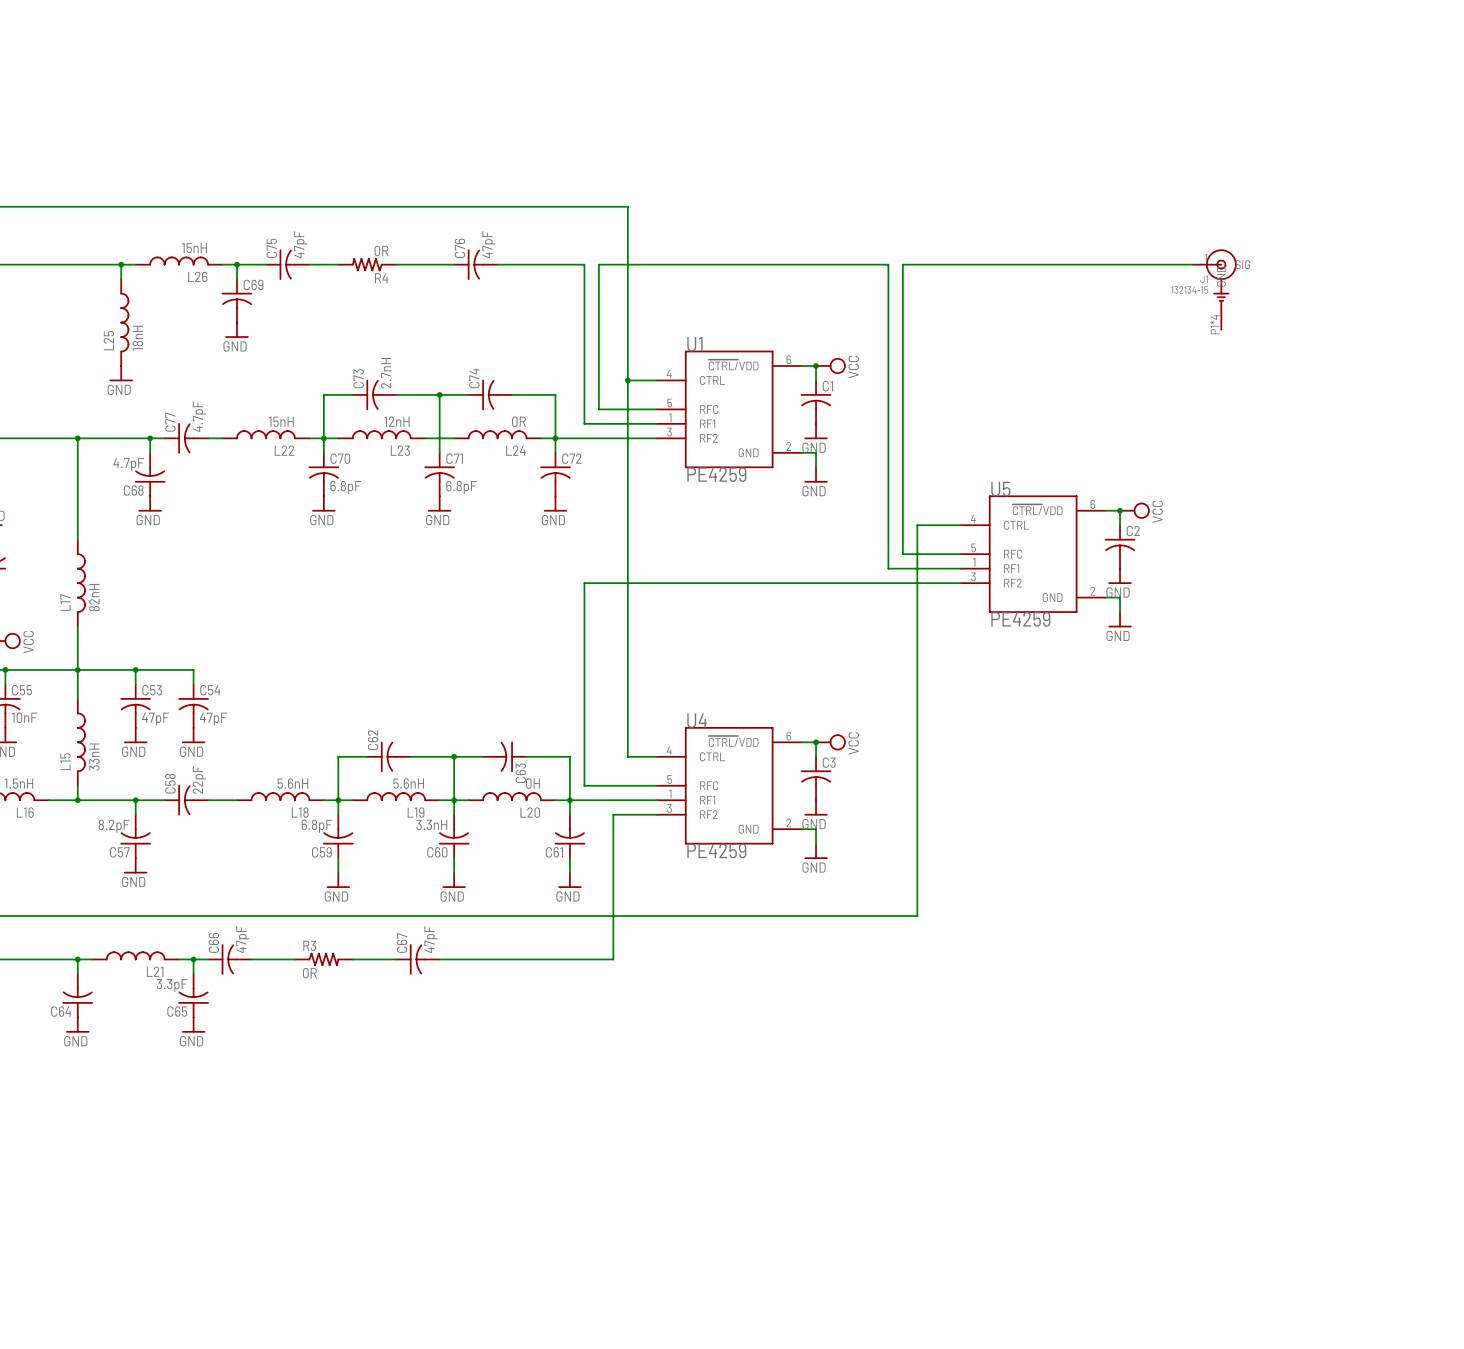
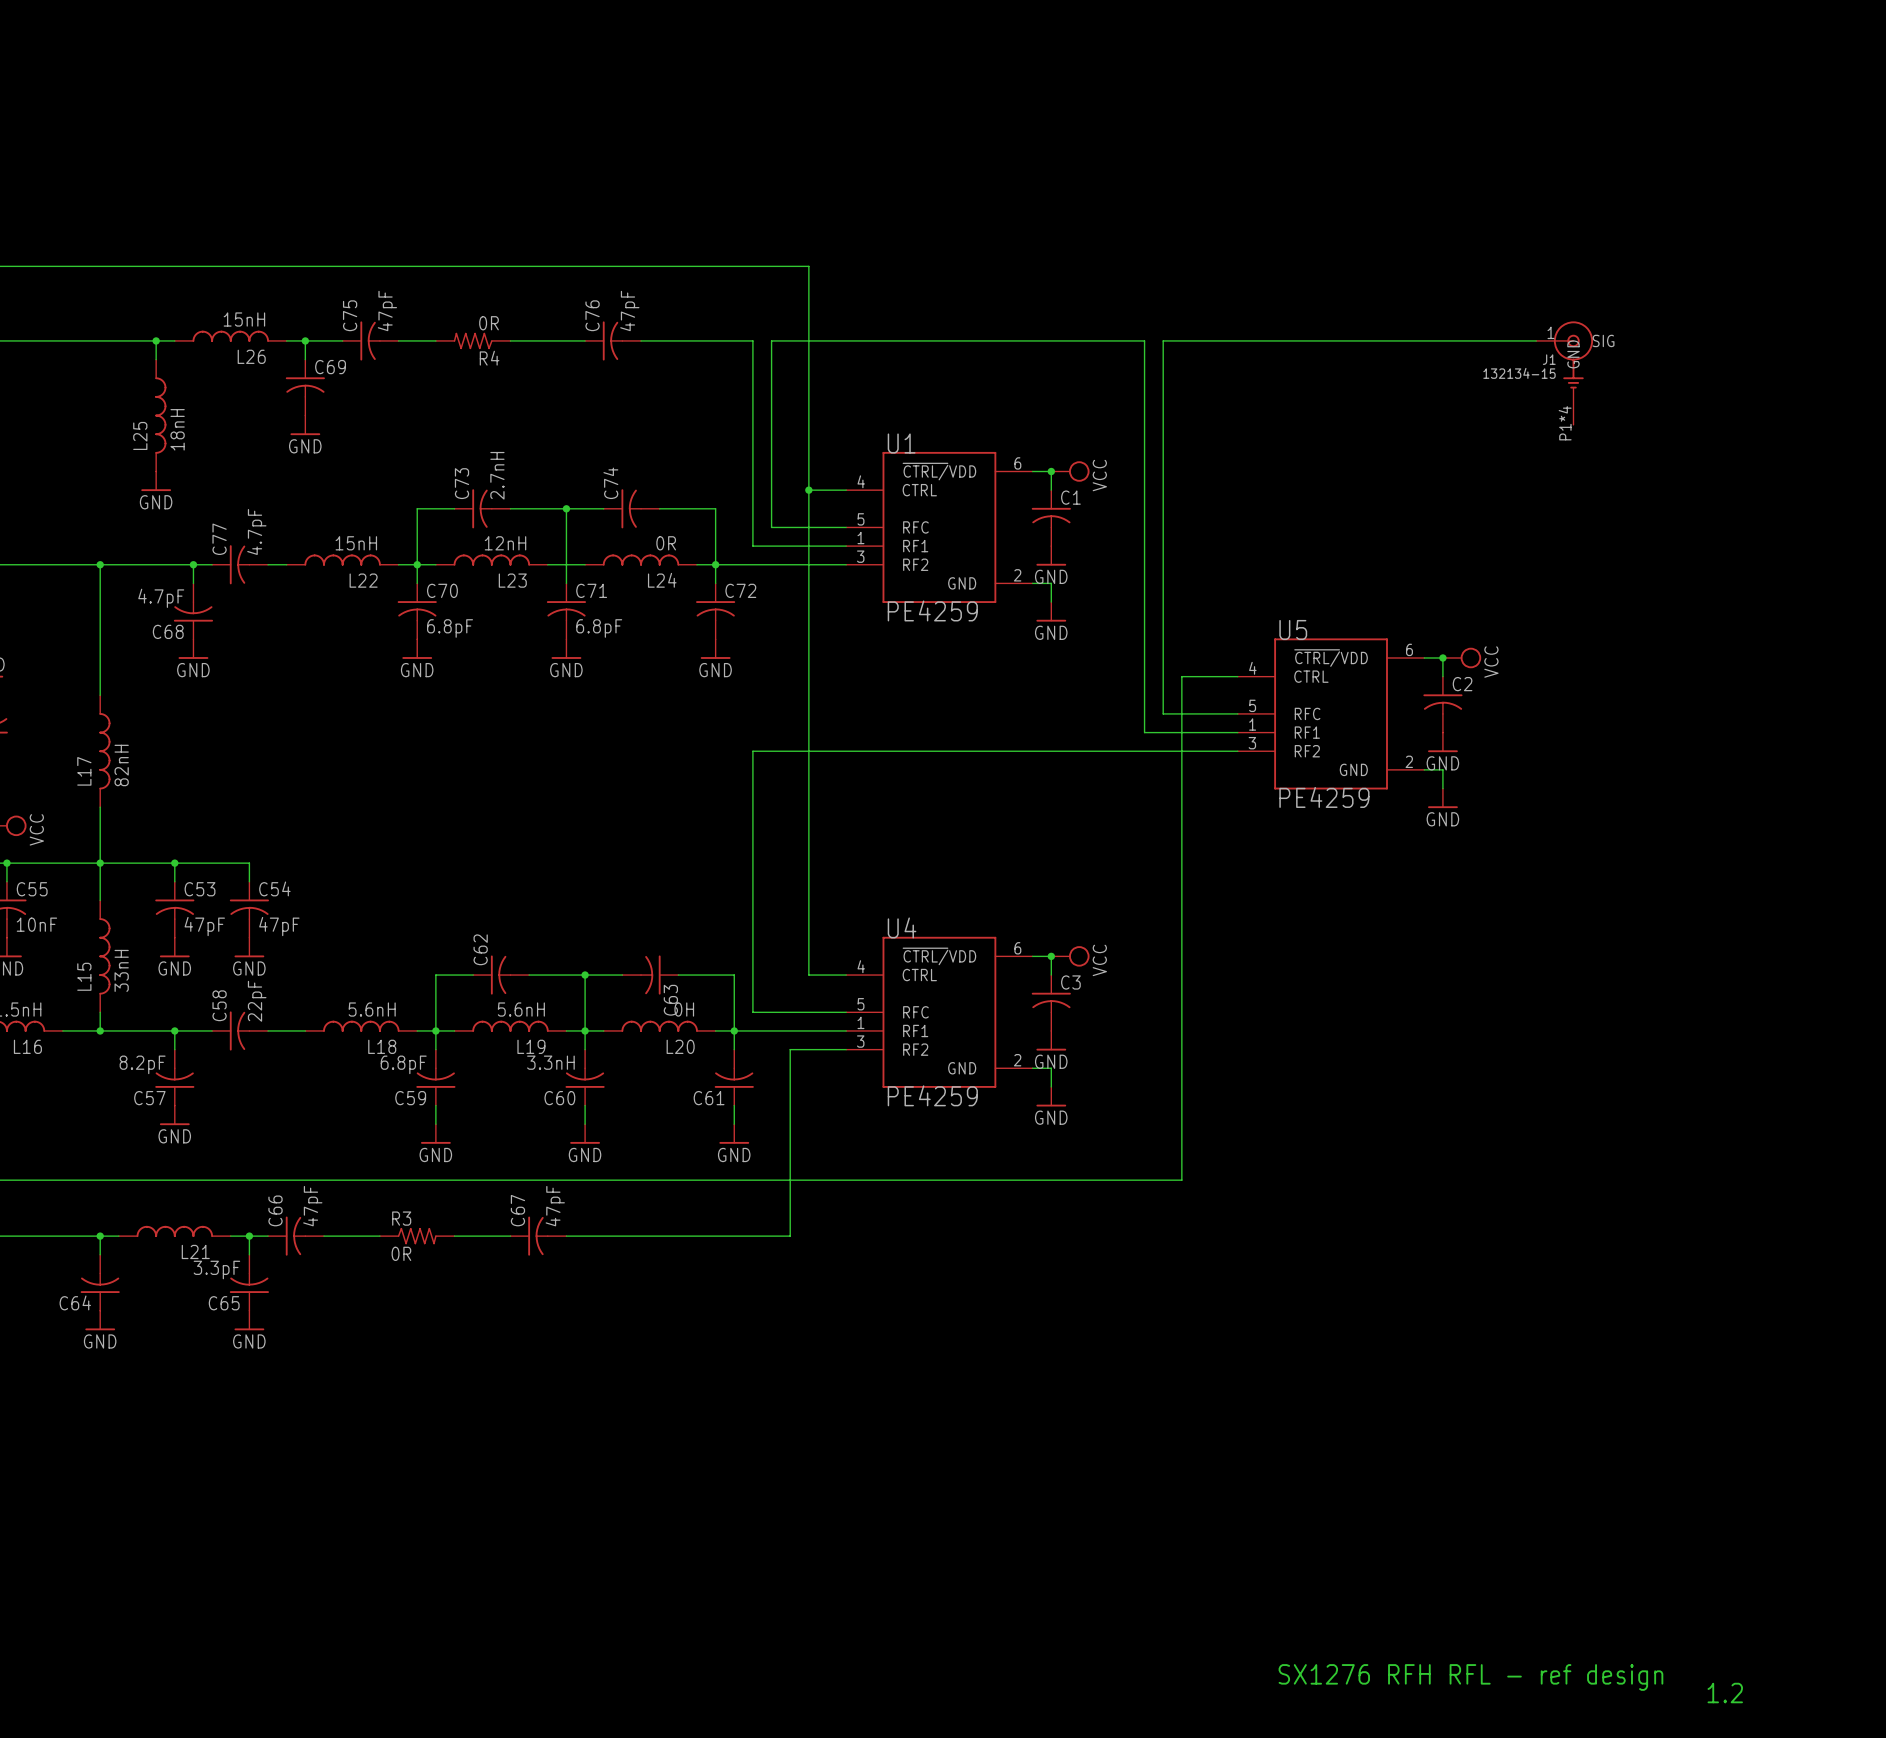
text: none -> SX1276 RFH RFL - ref design (1470, 1677)
text: none -> 1.2 (1725, 1693)

